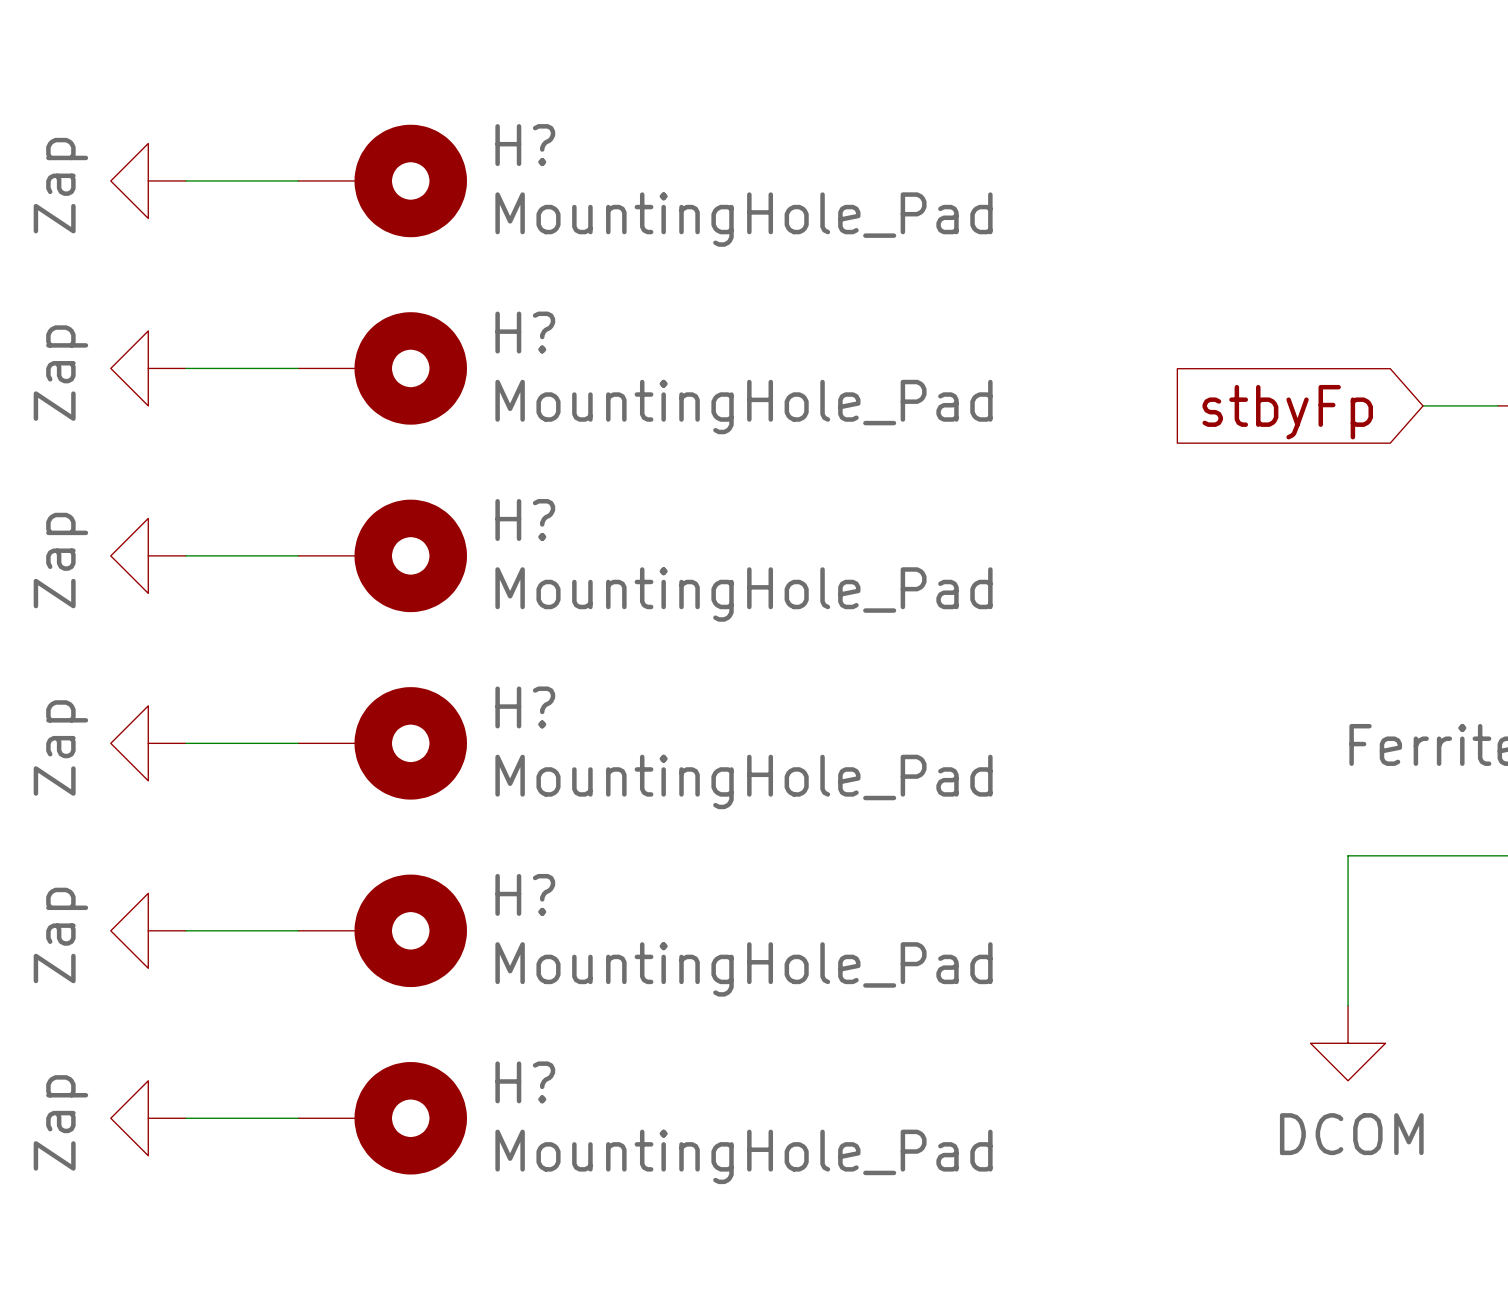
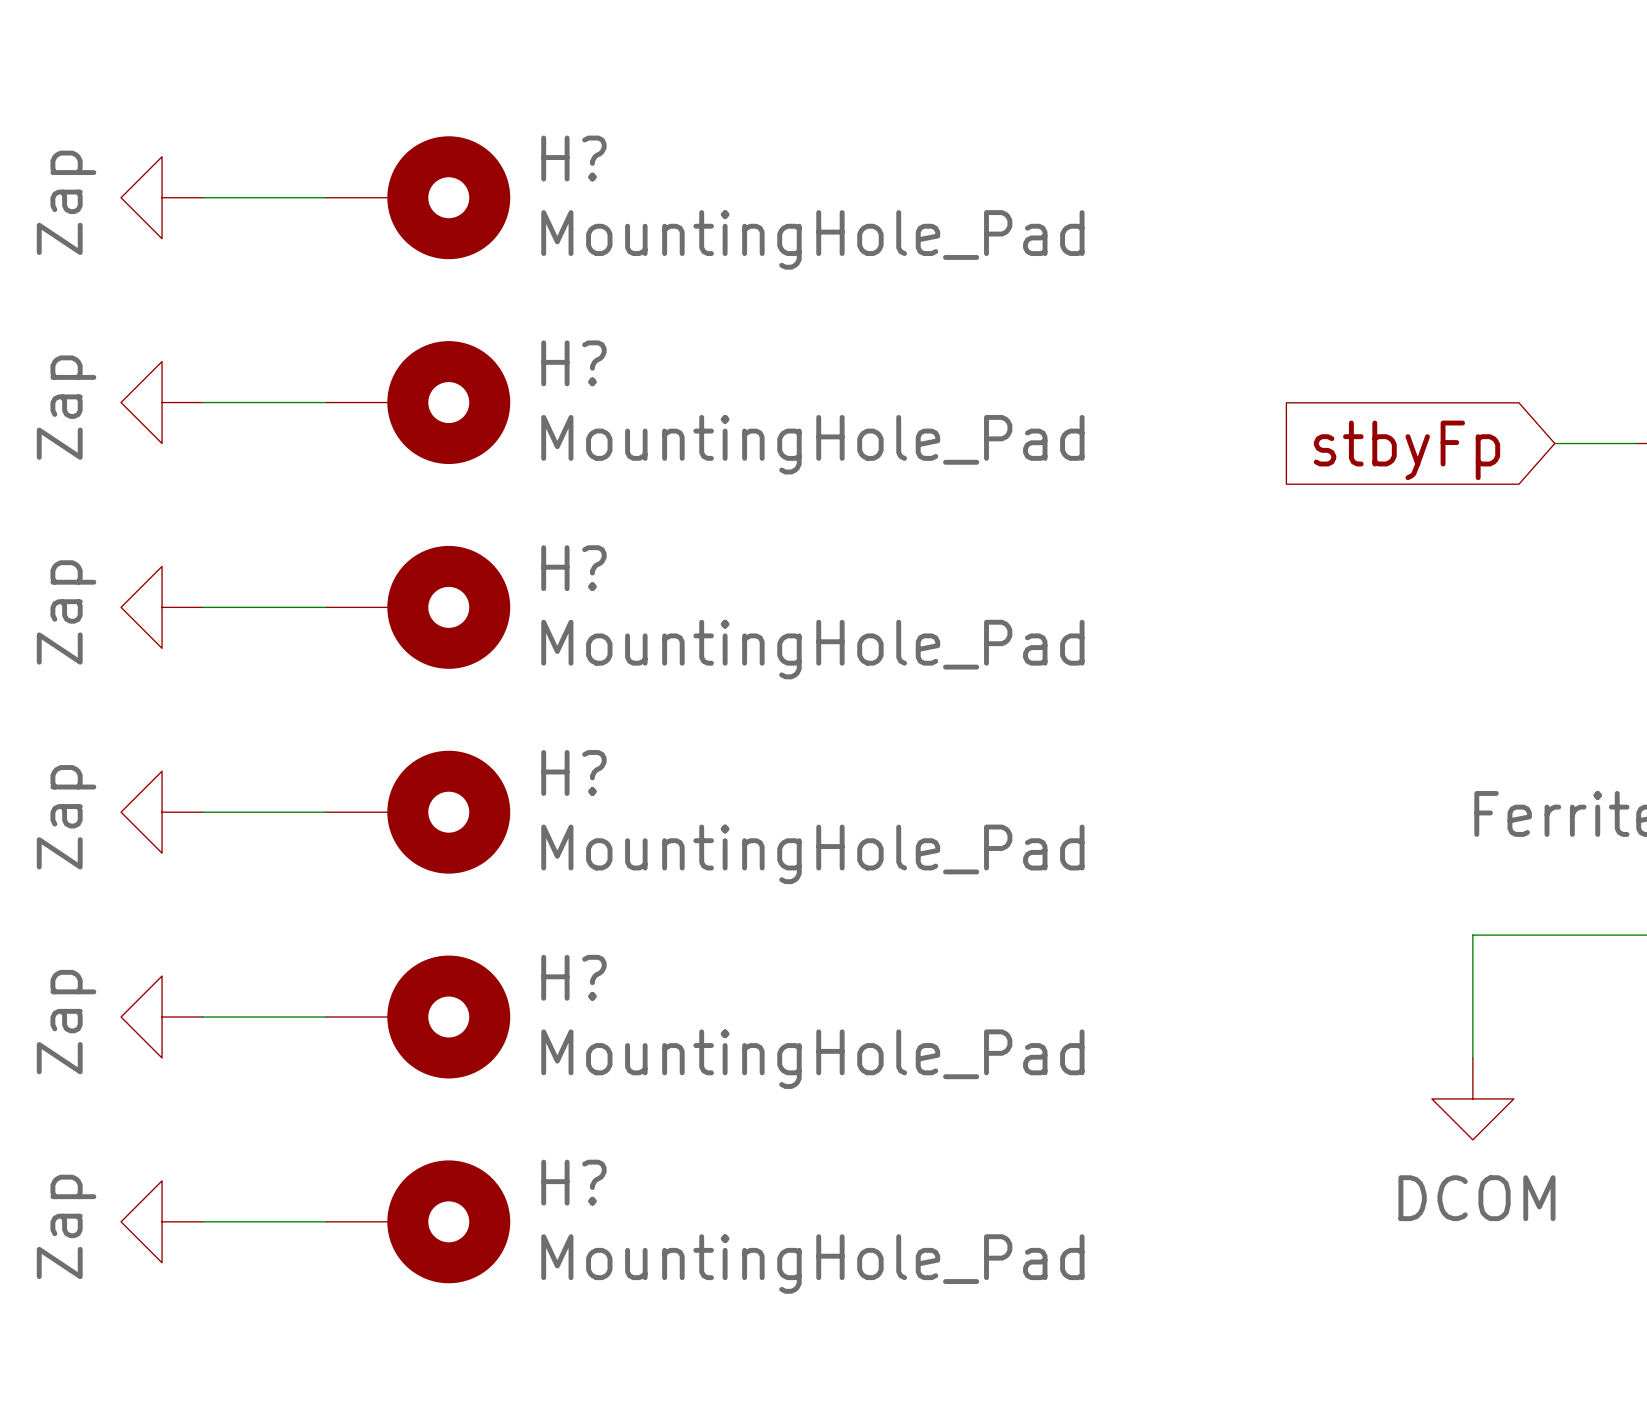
power symbol position: DCOM (1348, 1043) -> DCOM (1472, 1098)

